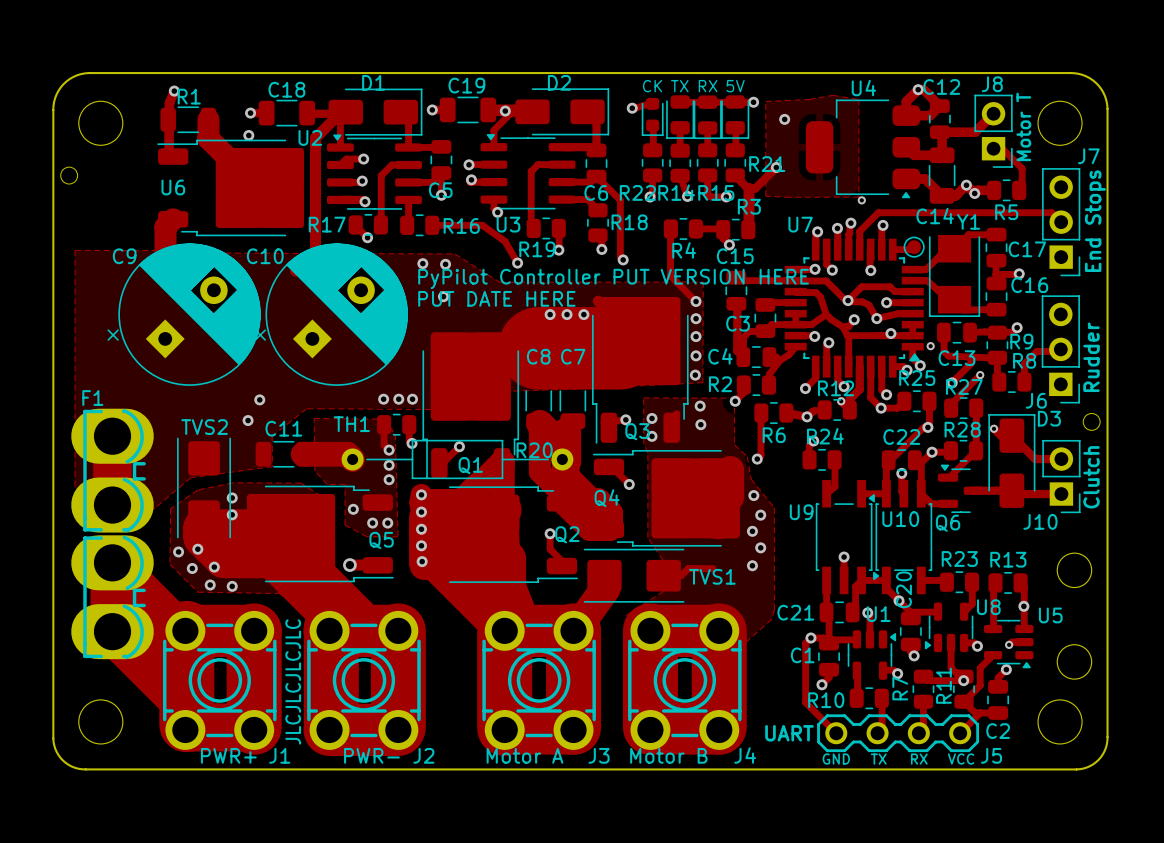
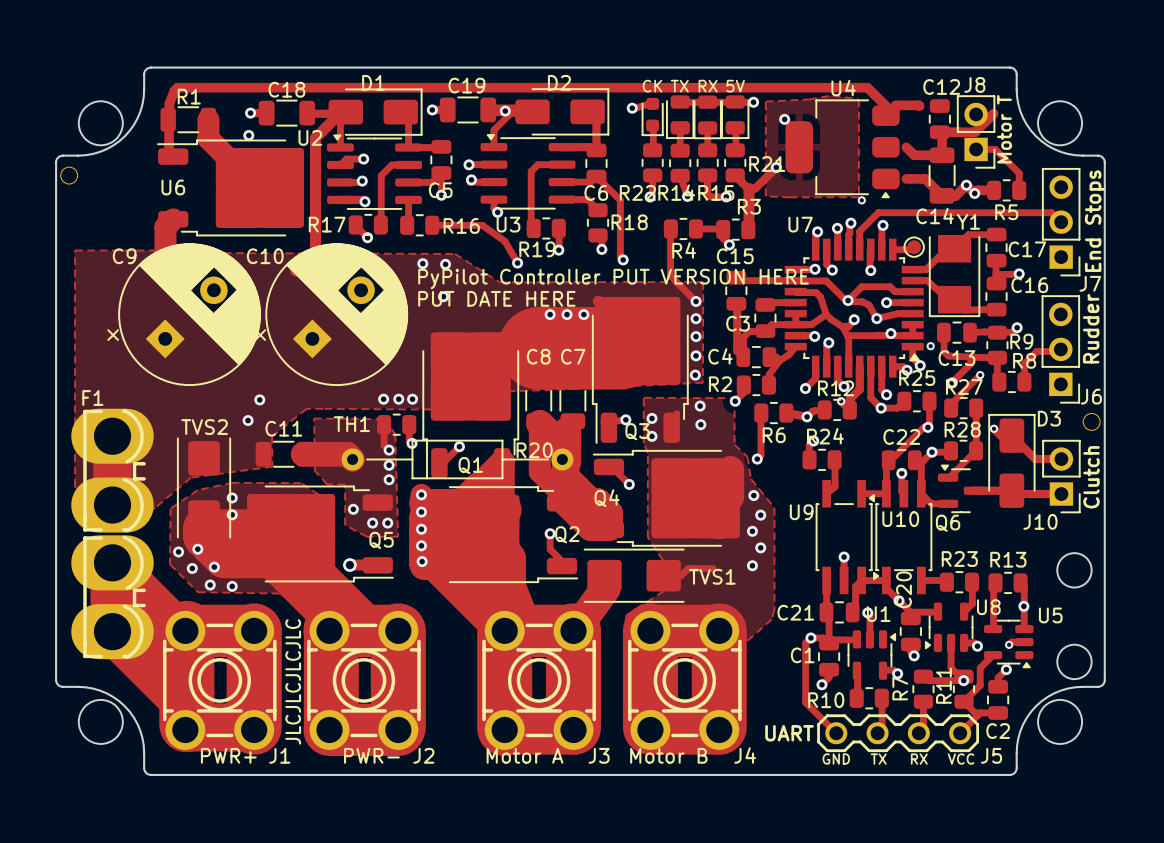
board edge: (89, 73) (1070, 73) (1089, 78) (1101, 89) (1107, 108) (1107, 737) (1103, 754) (1090, 766) (1076, 769) (85, 769) (68, 764) (58, 755) (53, 738) (53, 110) (55, 98) (63, 84) (73, 76) (89, 73) -> (151, 67) (144, 72) (143, 96) (140, 111) (134, 124) (124, 136) (113, 145) (99, 151) (85, 155) (61, 155) (56, 162) (56, 680) (61, 686) (85, 687) (99, 690) (113, 696) (124, 706) (134, 717) (140, 731) (143, 745) (144, 768) (147, 774) (1010, 774) (1016, 769) (1017, 745) (1020, 731) (1026, 717) (1036, 706) (1047, 696) (1060, 690) (1075, 687) (1098, 686) (1103, 683) (1104, 161) (1099, 155) (1075, 155) (1060, 151) (1047, 145) (1036, 136) (1026, 124) (1020, 111) (1017, 96) (1016, 73) (1013, 68) (151, 67)
track: (918, 89) (923, 89) (939, 106) (930, 115) (906, 115) (906, 101) (918, 89) -> none
via: (918, 89) -> none
track: none -> (174, 91) (177, 87) (867, 87) (885, 106) (885, 115) (896, 105) (919, 106)
via: (174, 91) -> none
text position: Motor T (1023, 126) -> Motor T (1004, 129)
J8 position: (993, 131) -> (976, 131)
U4 position: (862, 148) -> (842, 148)
track: (1001, 148) (1022, 168) (1022, 189) -> none
track: none -> (976, 149) (995, 149) (1019, 173) (1019, 190)
J7 name position: J7 (1088, 156) -> J7 (1090, 283)
text position: Rudder (1091, 357) -> Rudder (1091, 328)
J6 name position: J6 (1036, 400) -> J6 (1091, 396)

